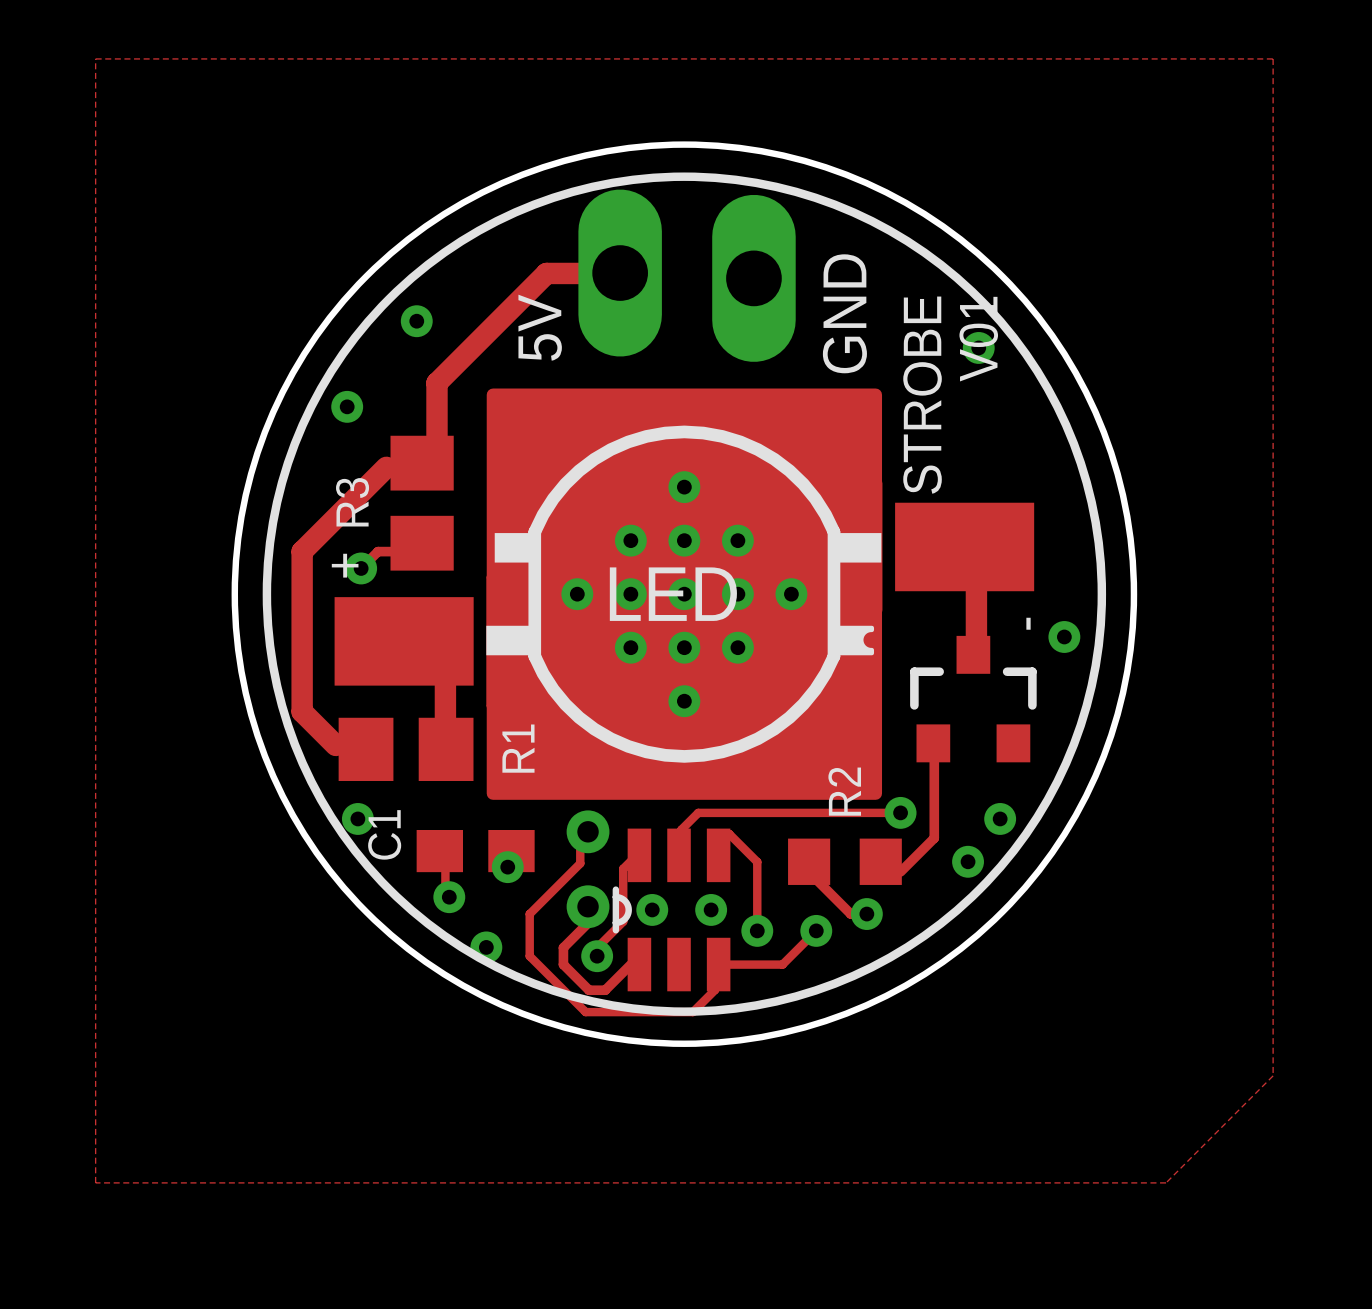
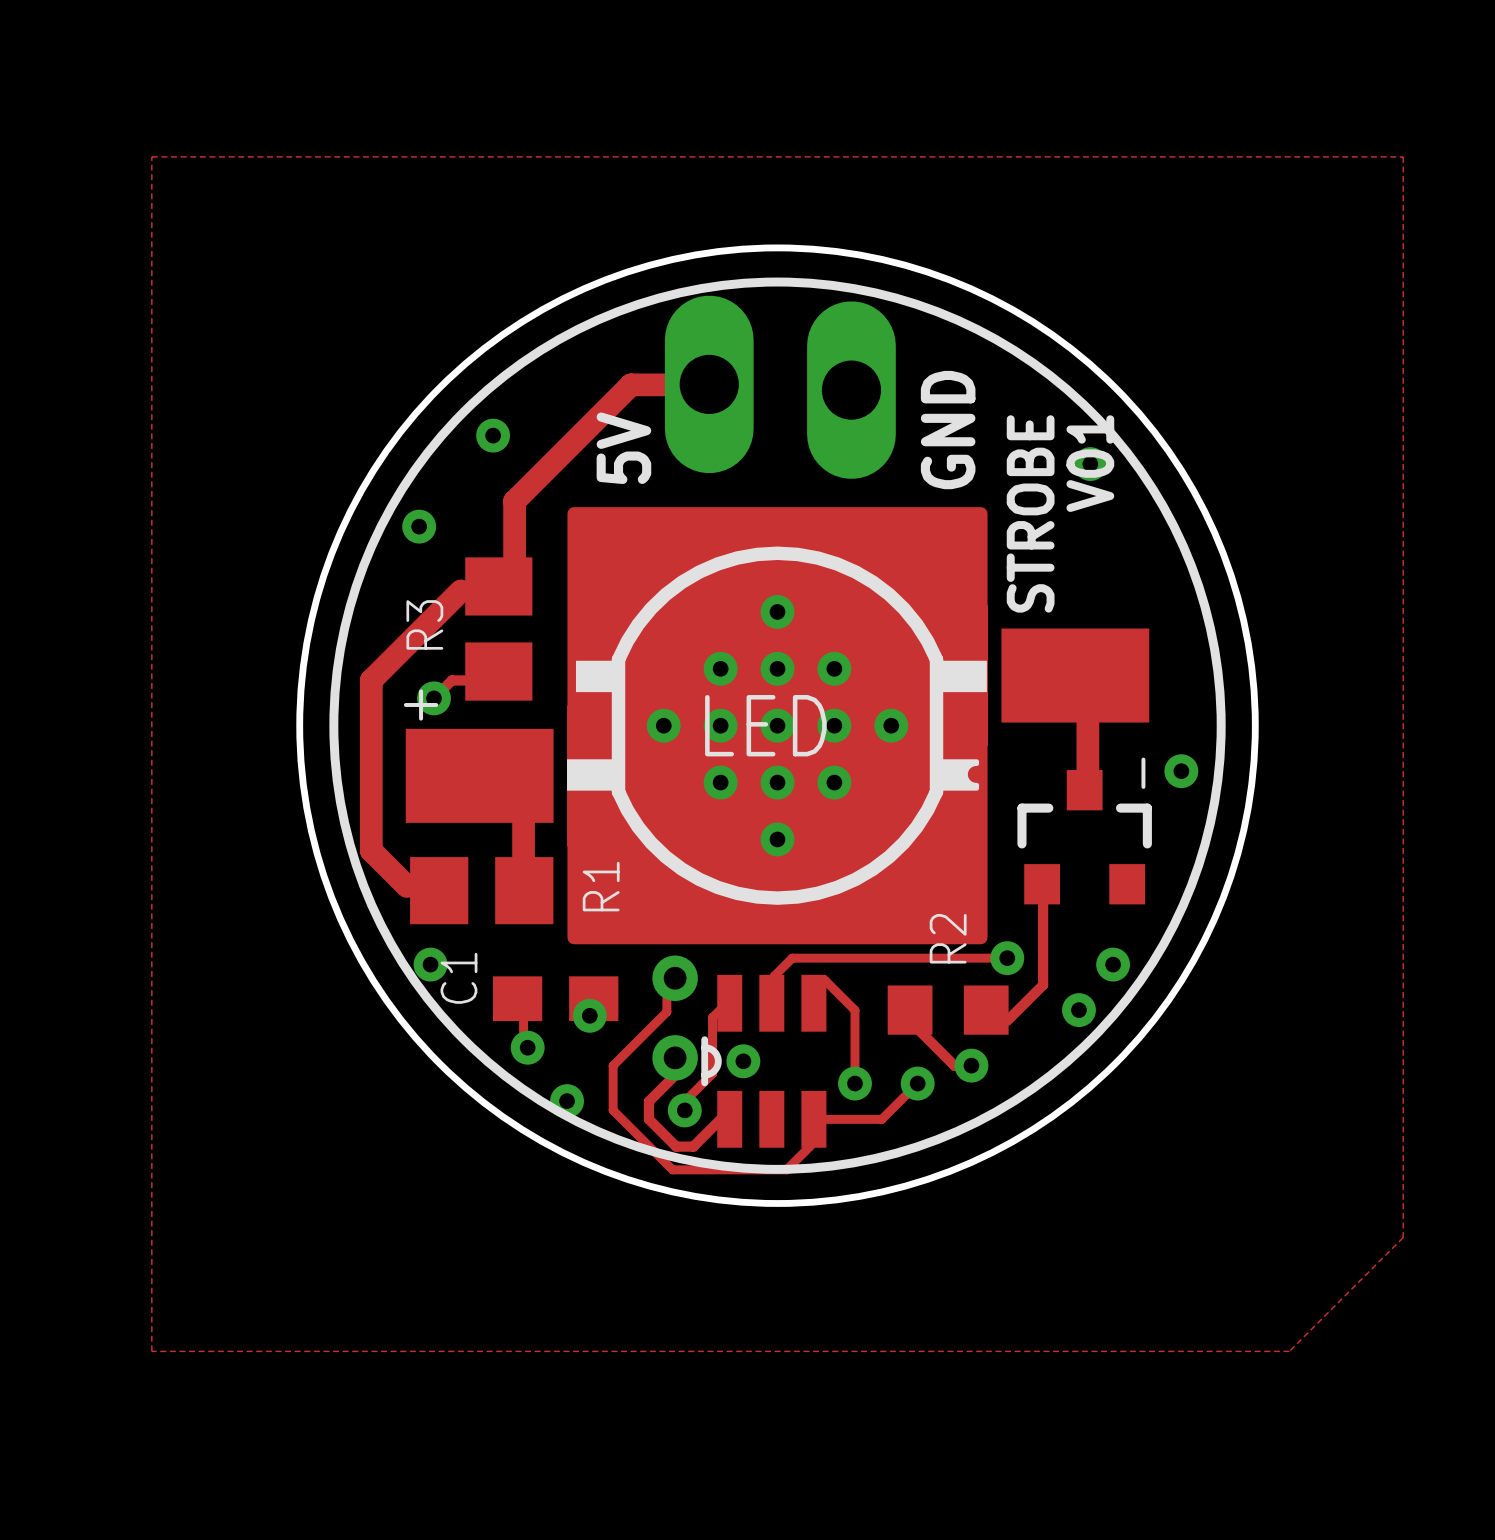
via: (711, 909) -> none

